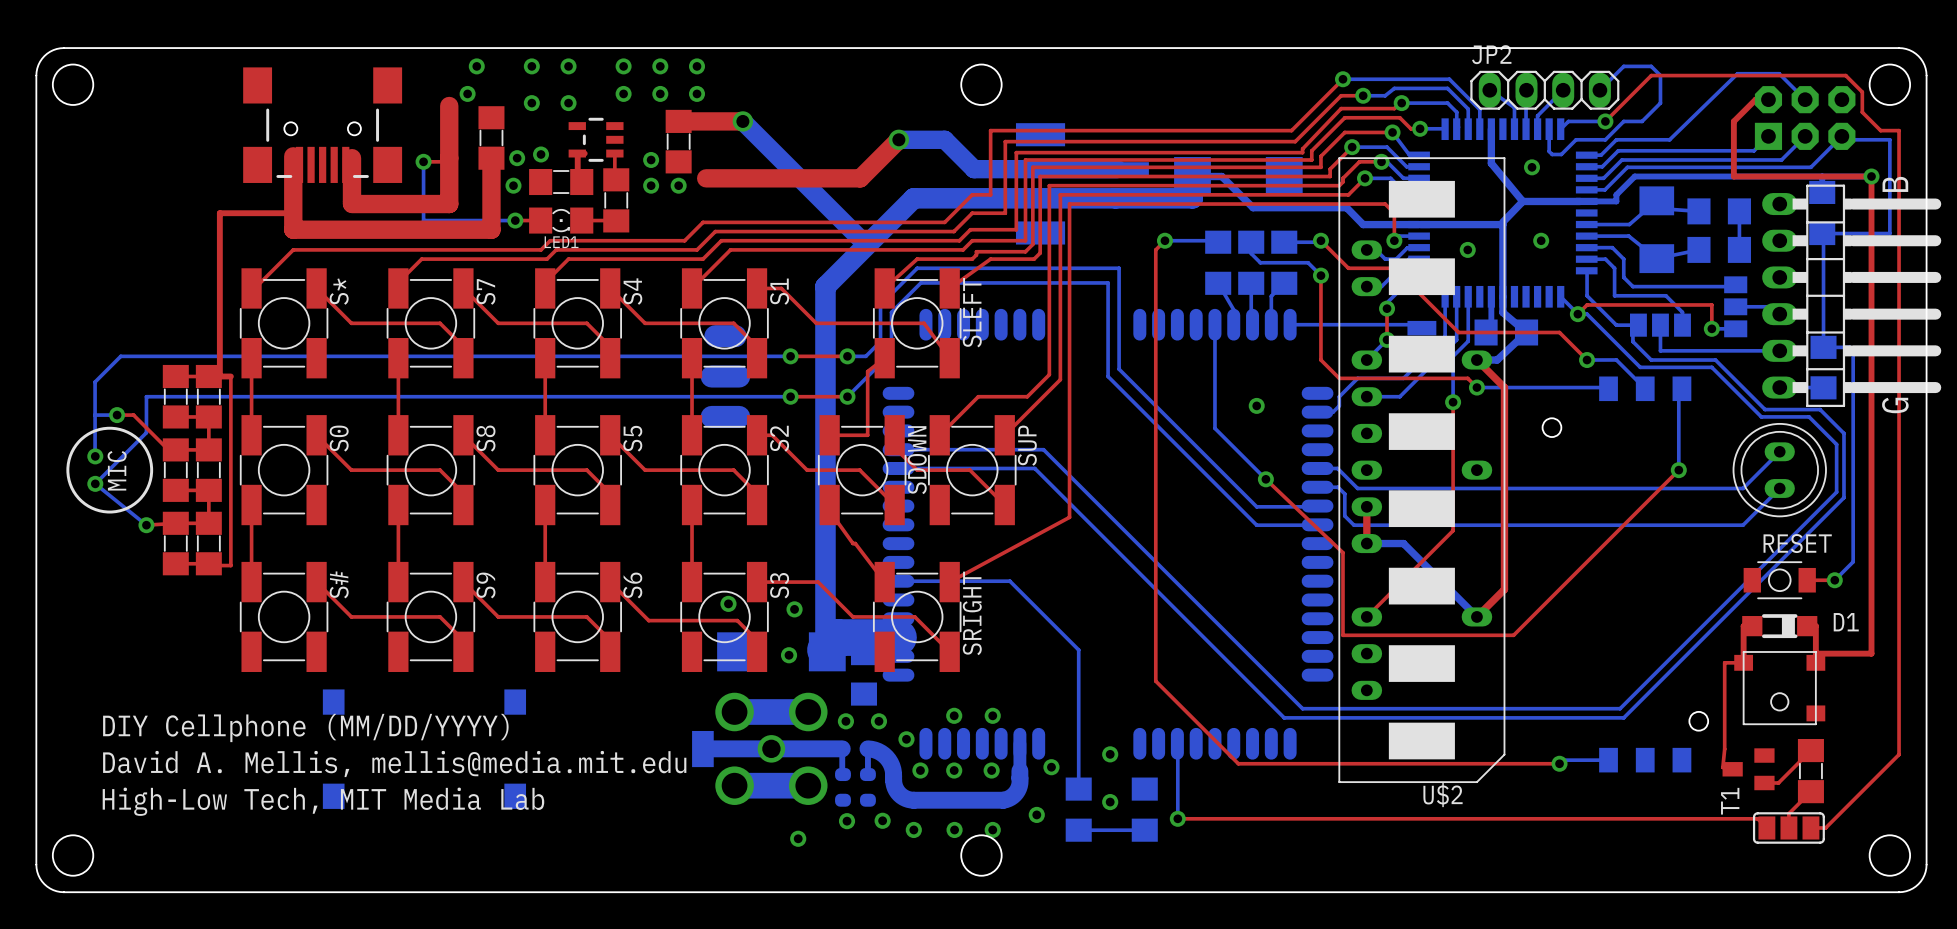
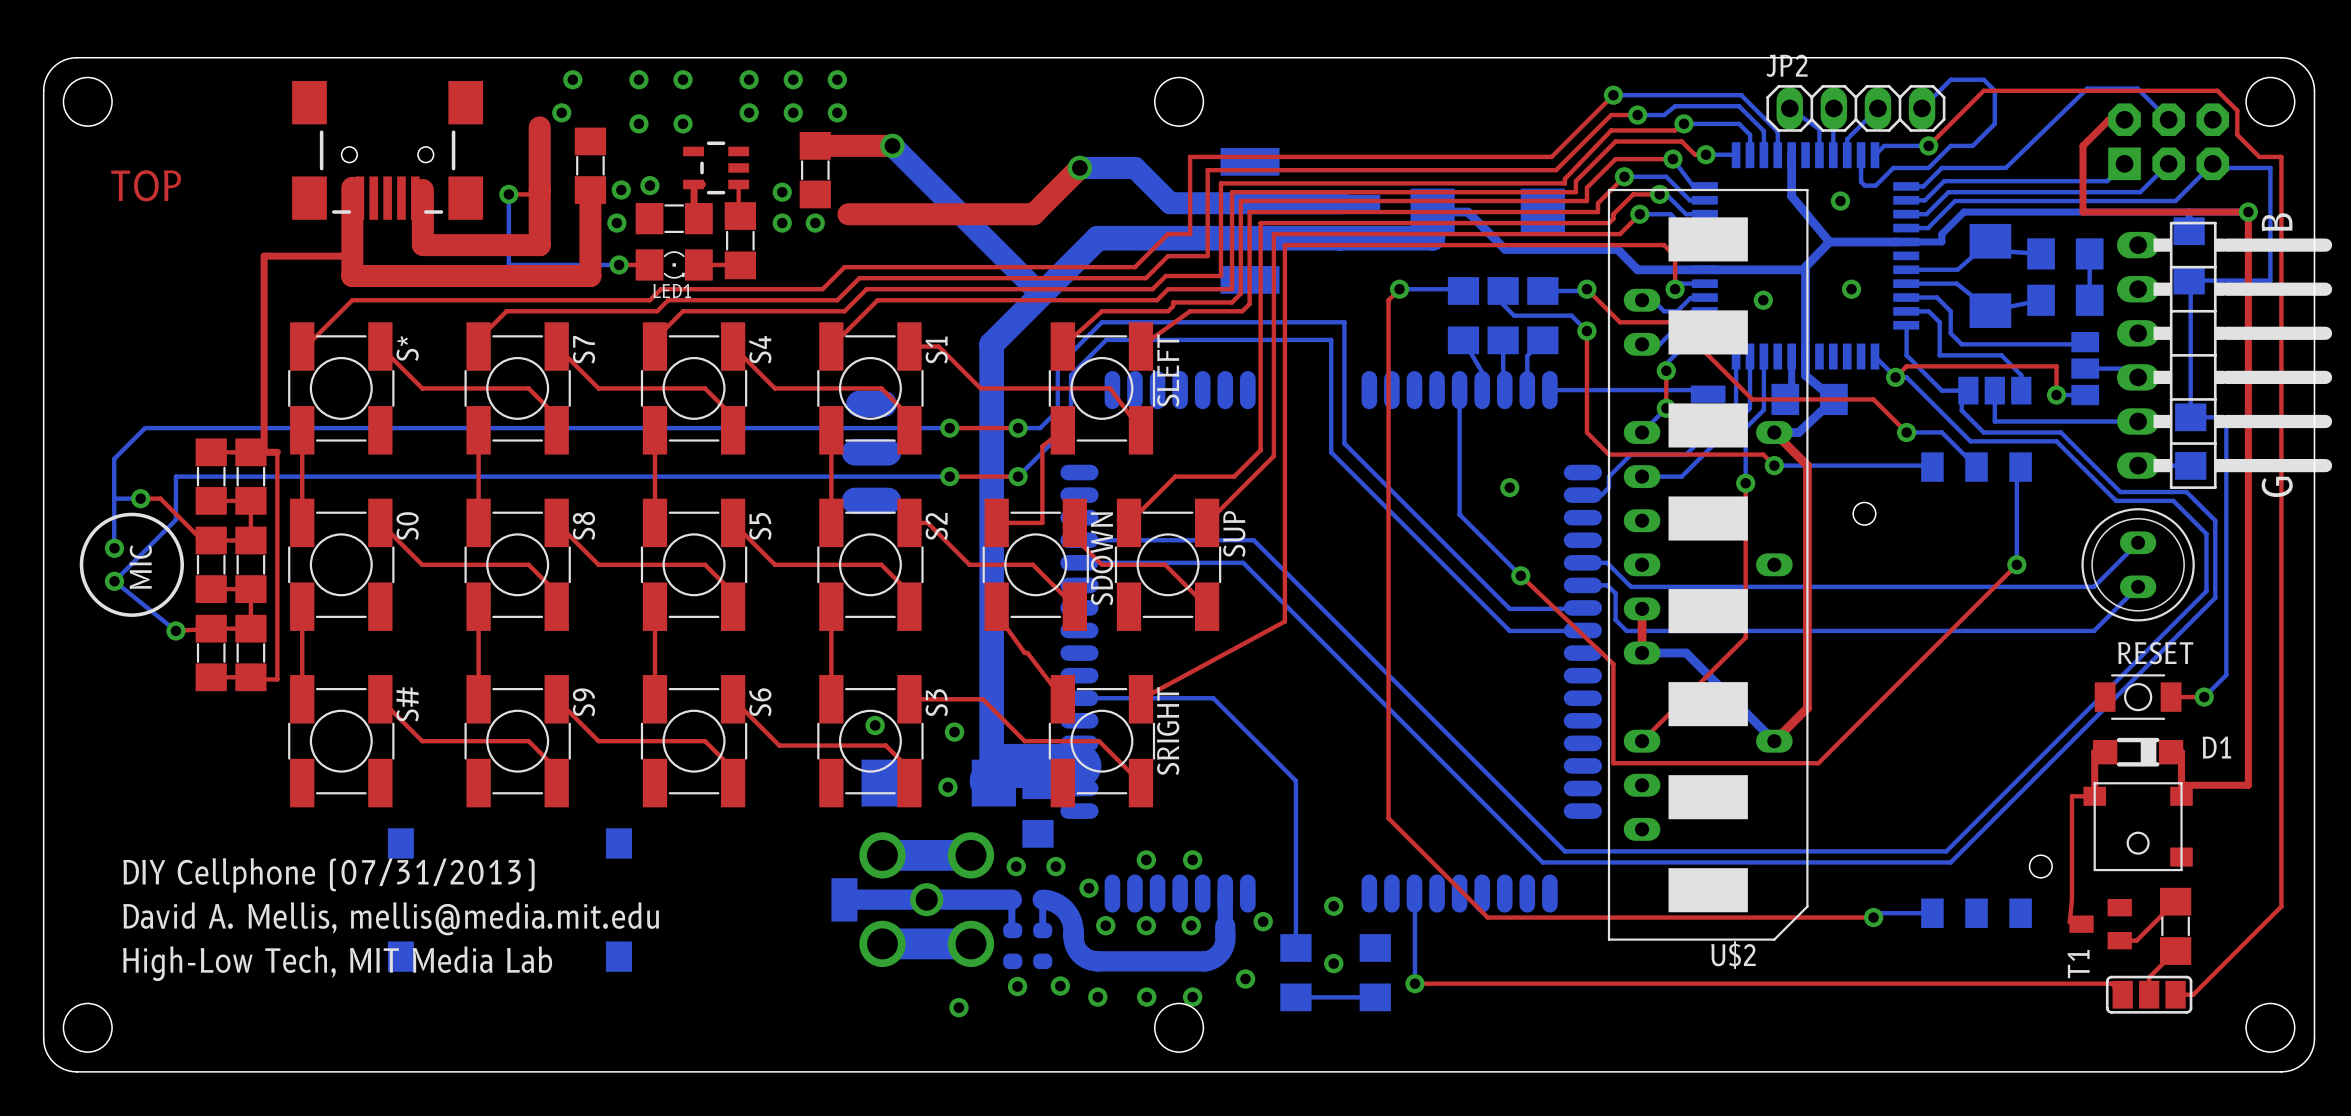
text: none -> TOP (146, 185)
text: DIY Cellphone (MM/DD/YYYY) (305, 727) -> DIY Cellphone (07/31/2013) (328, 875)

